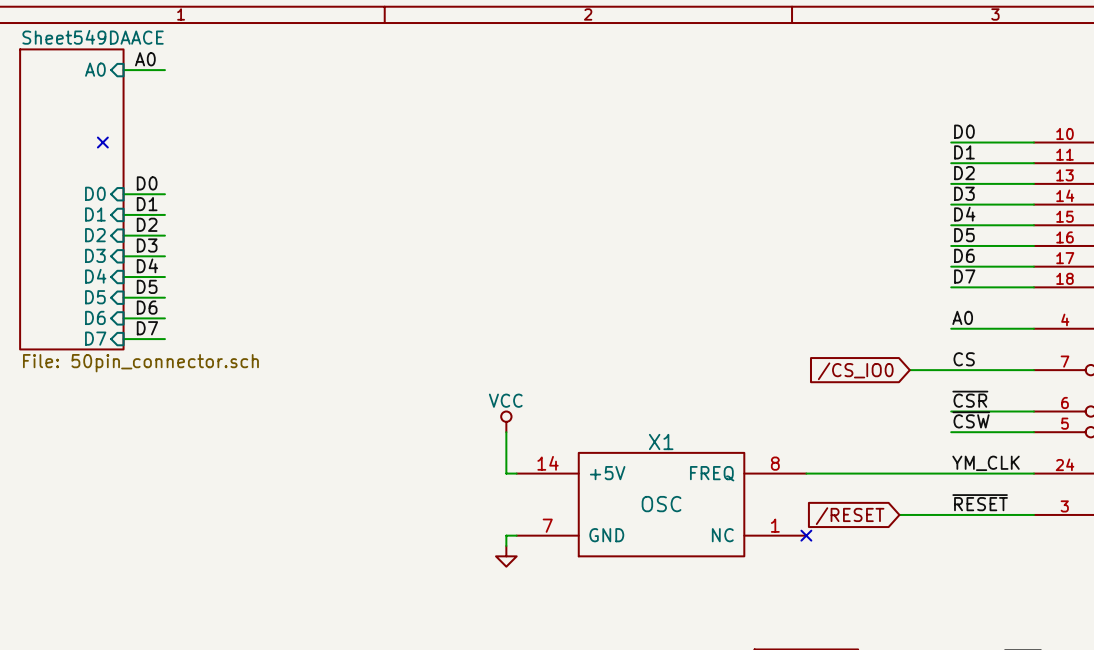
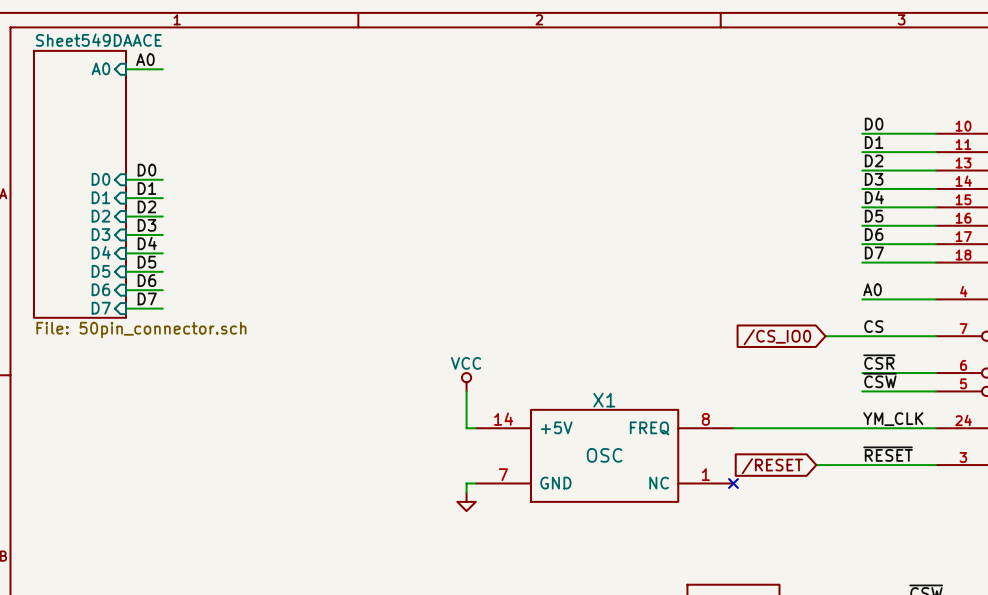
no-connect mark: (102, 142) -> none

